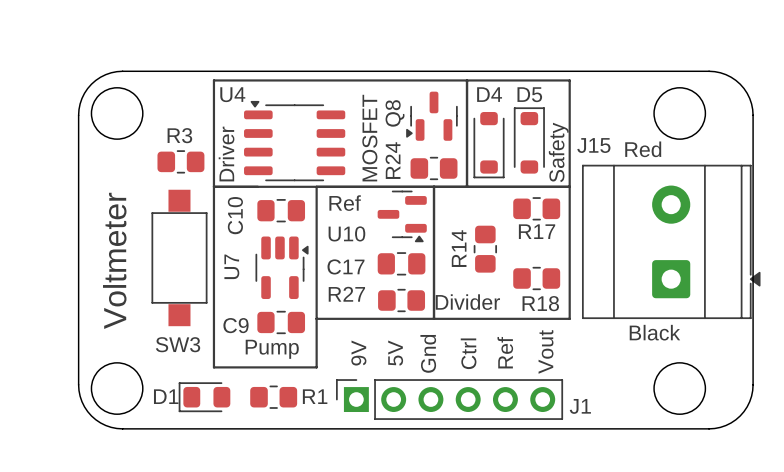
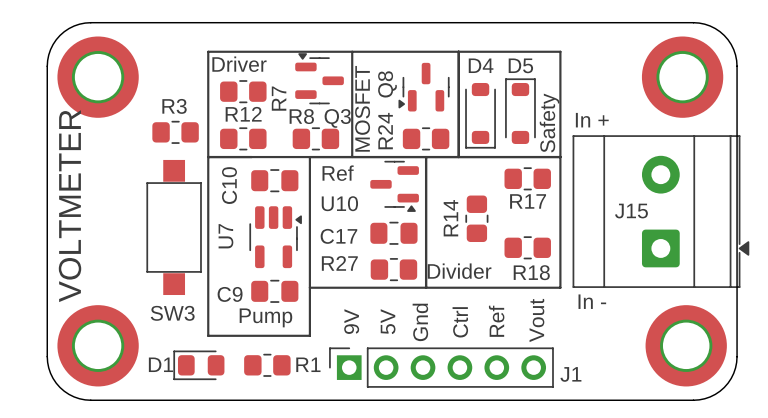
board edge: (122, 71) (709, 71) (731, 77) (747, 93) (753, 115) (753, 384) (747, 406) (731, 422) (709, 428) (122, 428) (100, 422) (84, 406) (79, 390) (78, 115) (81, 98) (91, 84) (105, 74) (122, 71) -> (90, 22) (74, 26) (60, 35) (50, 49) (47, 66) (47, 362) (53, 378) (69, 394) (90, 400) (693, 400) (715, 394) (731, 378) (737, 356) (737, 66) (731, 44) (715, 28) (693, 22) (90, 22)
line: none -> (352, 51) (352, 157)
round board edge: [90, 87, 144, 140] -> none
round board edge: [653, 87, 707, 140] -> none
part: none -> (98, 77)
part: none -> (682, 77)
Q3: none -> (319, 78)
R7: none -> (243, 91)
U4: (294, 141) -> none
J15 name position: J15 (593, 145) -> J15 (631, 211)
text: none -> In + (592, 120)
text: Red (643, 149) -> none
text rotation: 0° (226, 154) -> 90° clockwise (239, 64)
R12: none -> (243, 138)
R8: none -> (315, 138)
text: none -> VOLTMETER (70, 206)
text: Voltmeter (114, 260) -> none
text: none -> In - (592, 301)
text: Black (654, 332) -> none
round board edge: [90, 362, 144, 415] -> none
round board edge: [653, 362, 707, 415] -> none
part: none -> (98, 345)
part: none -> (686, 345)

